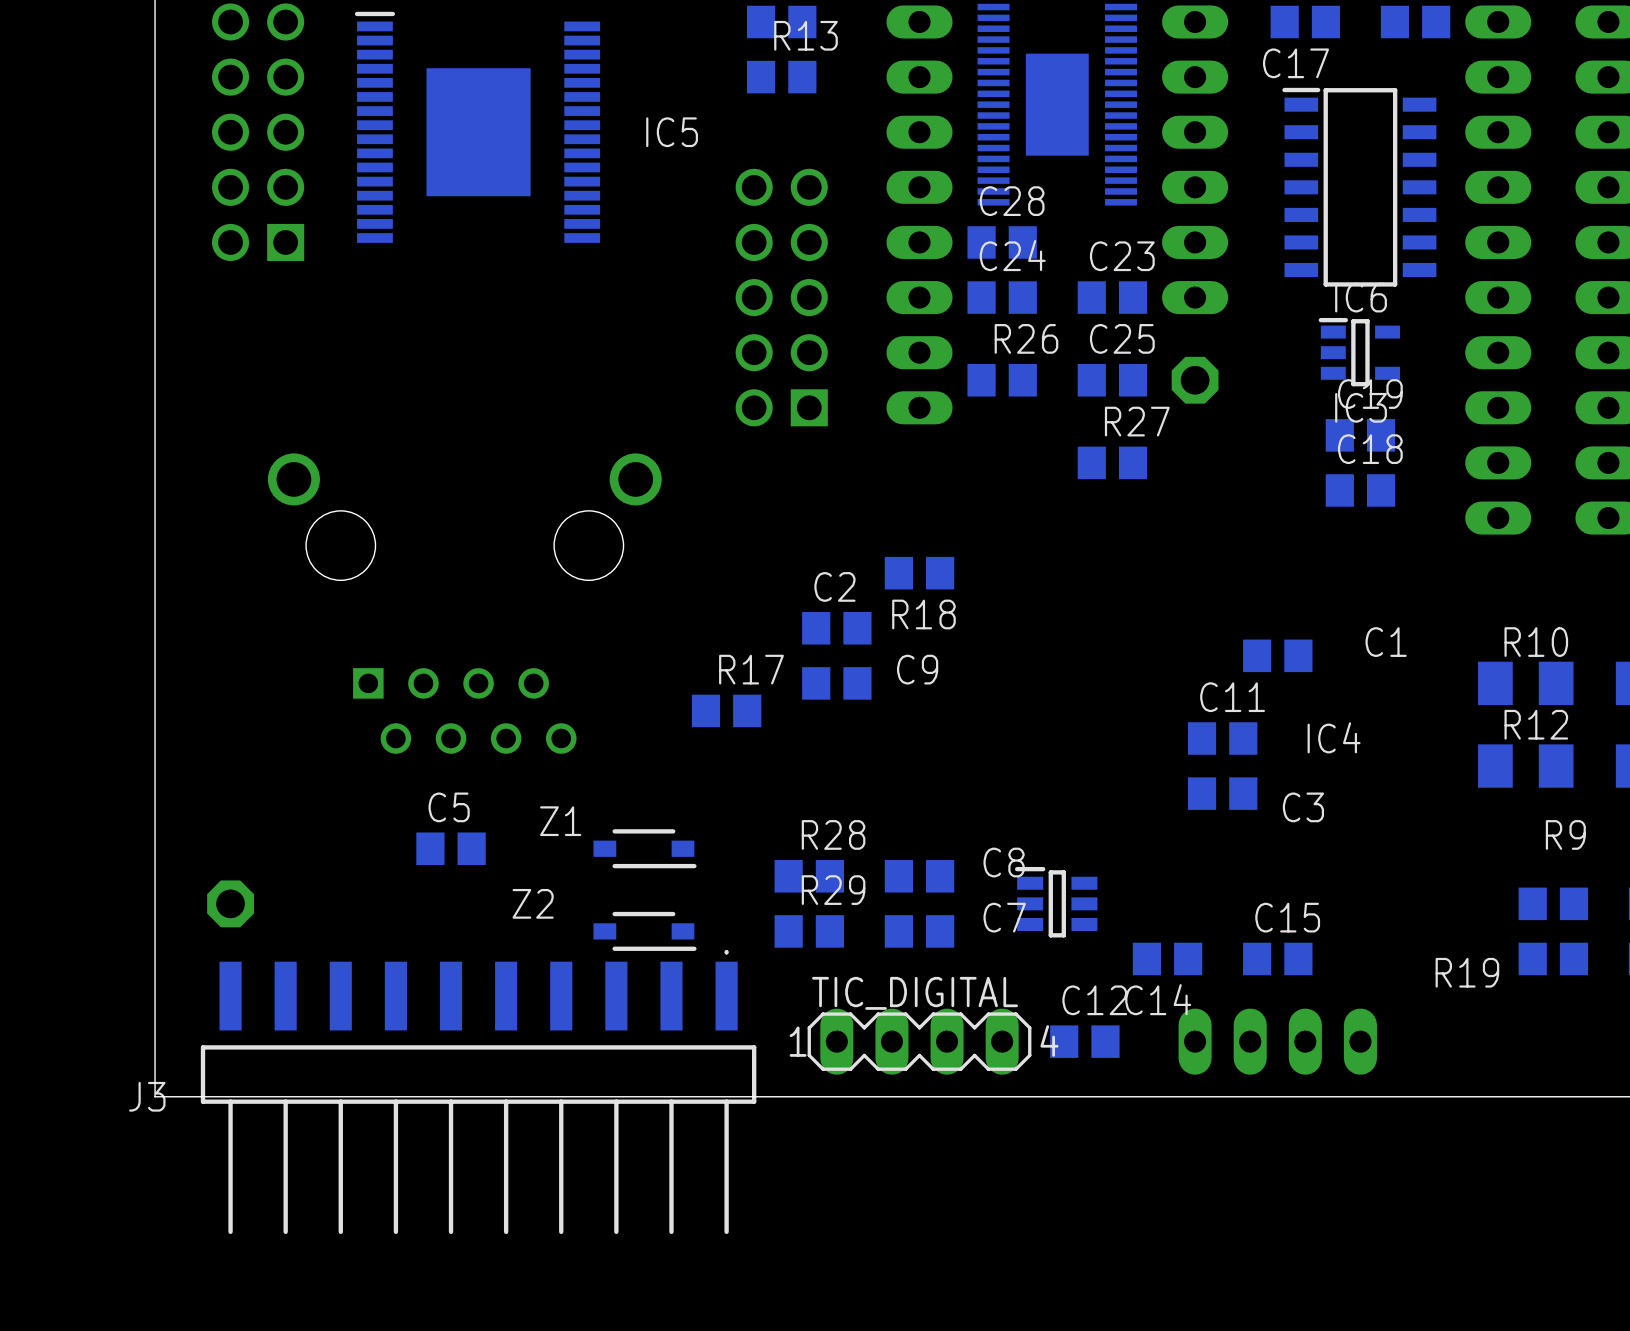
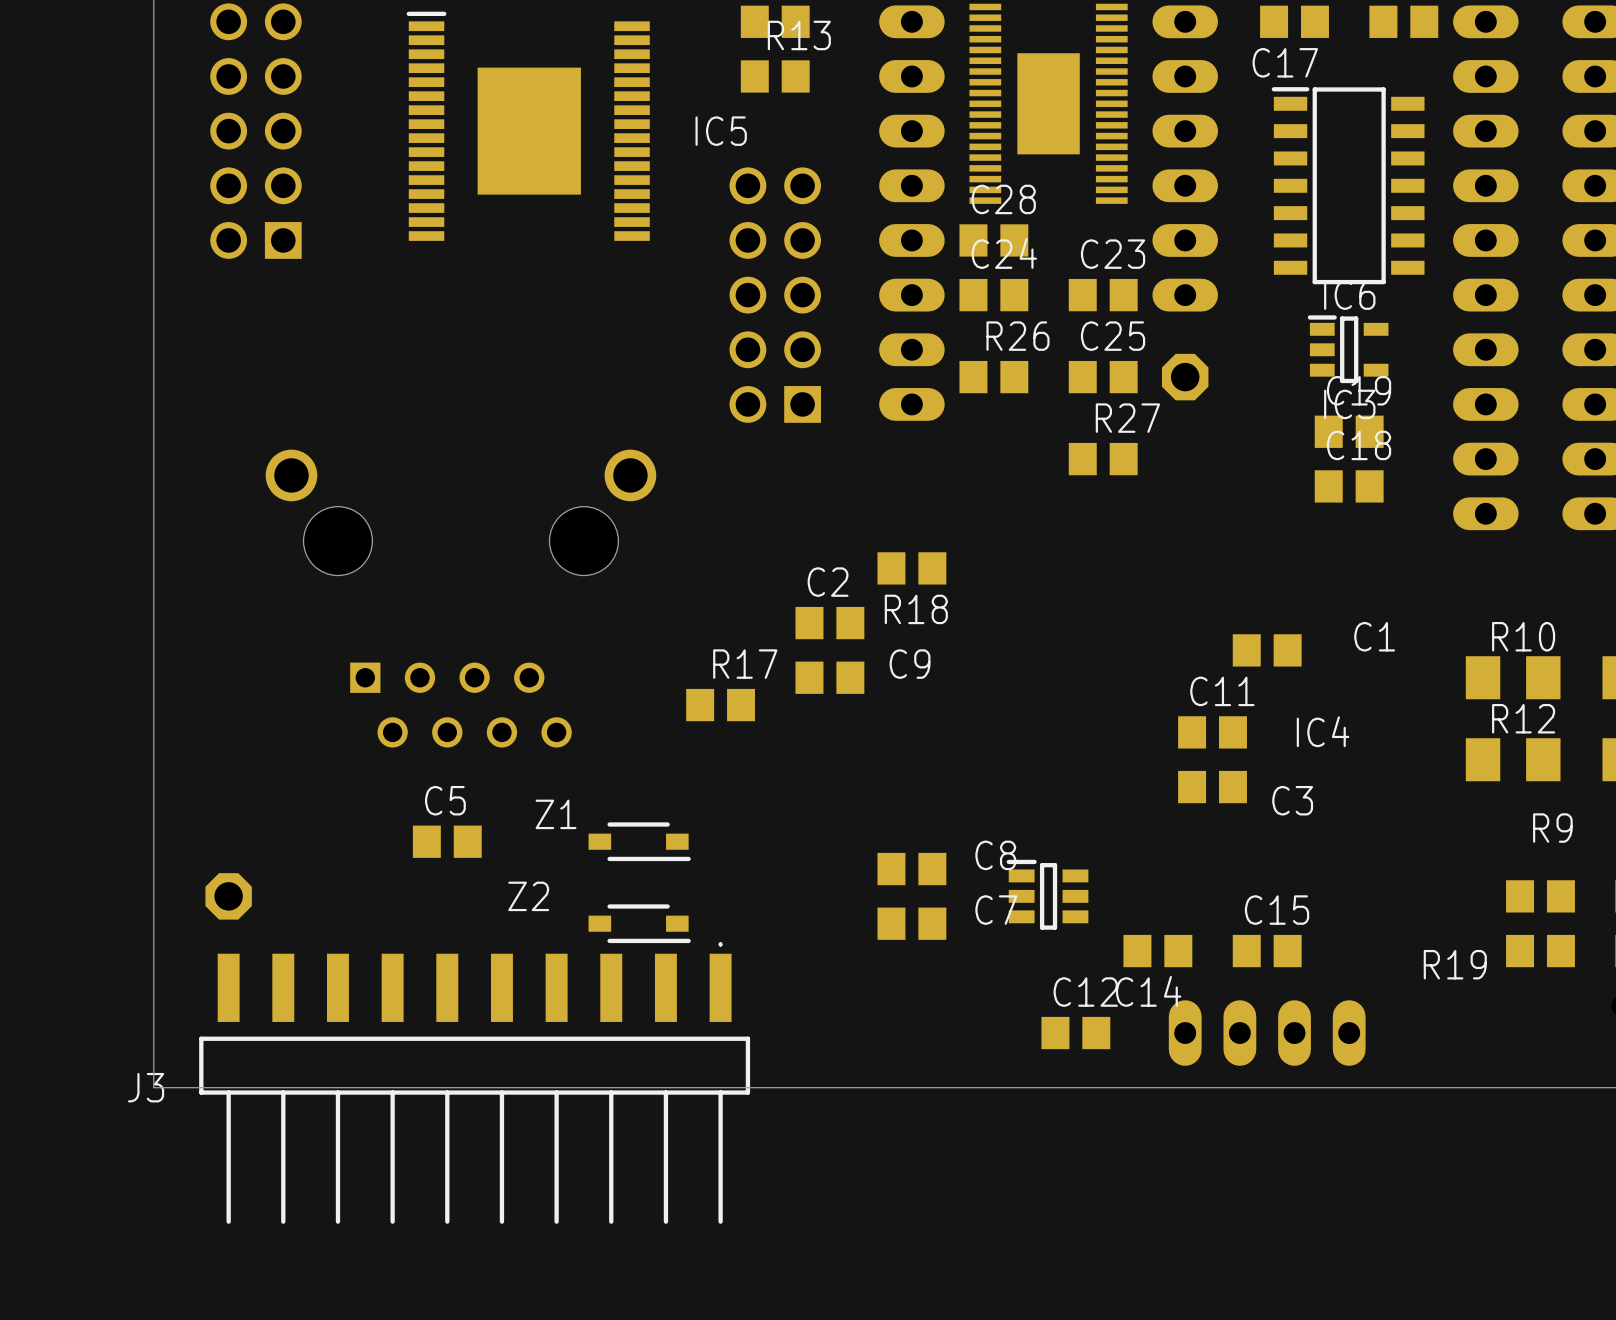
IC5 position: (477, 127) -> (528, 126)
R28: (809, 876) -> none
R29: (809, 931) -> none
TIC_DIGITAL: (919, 1041) -> none

